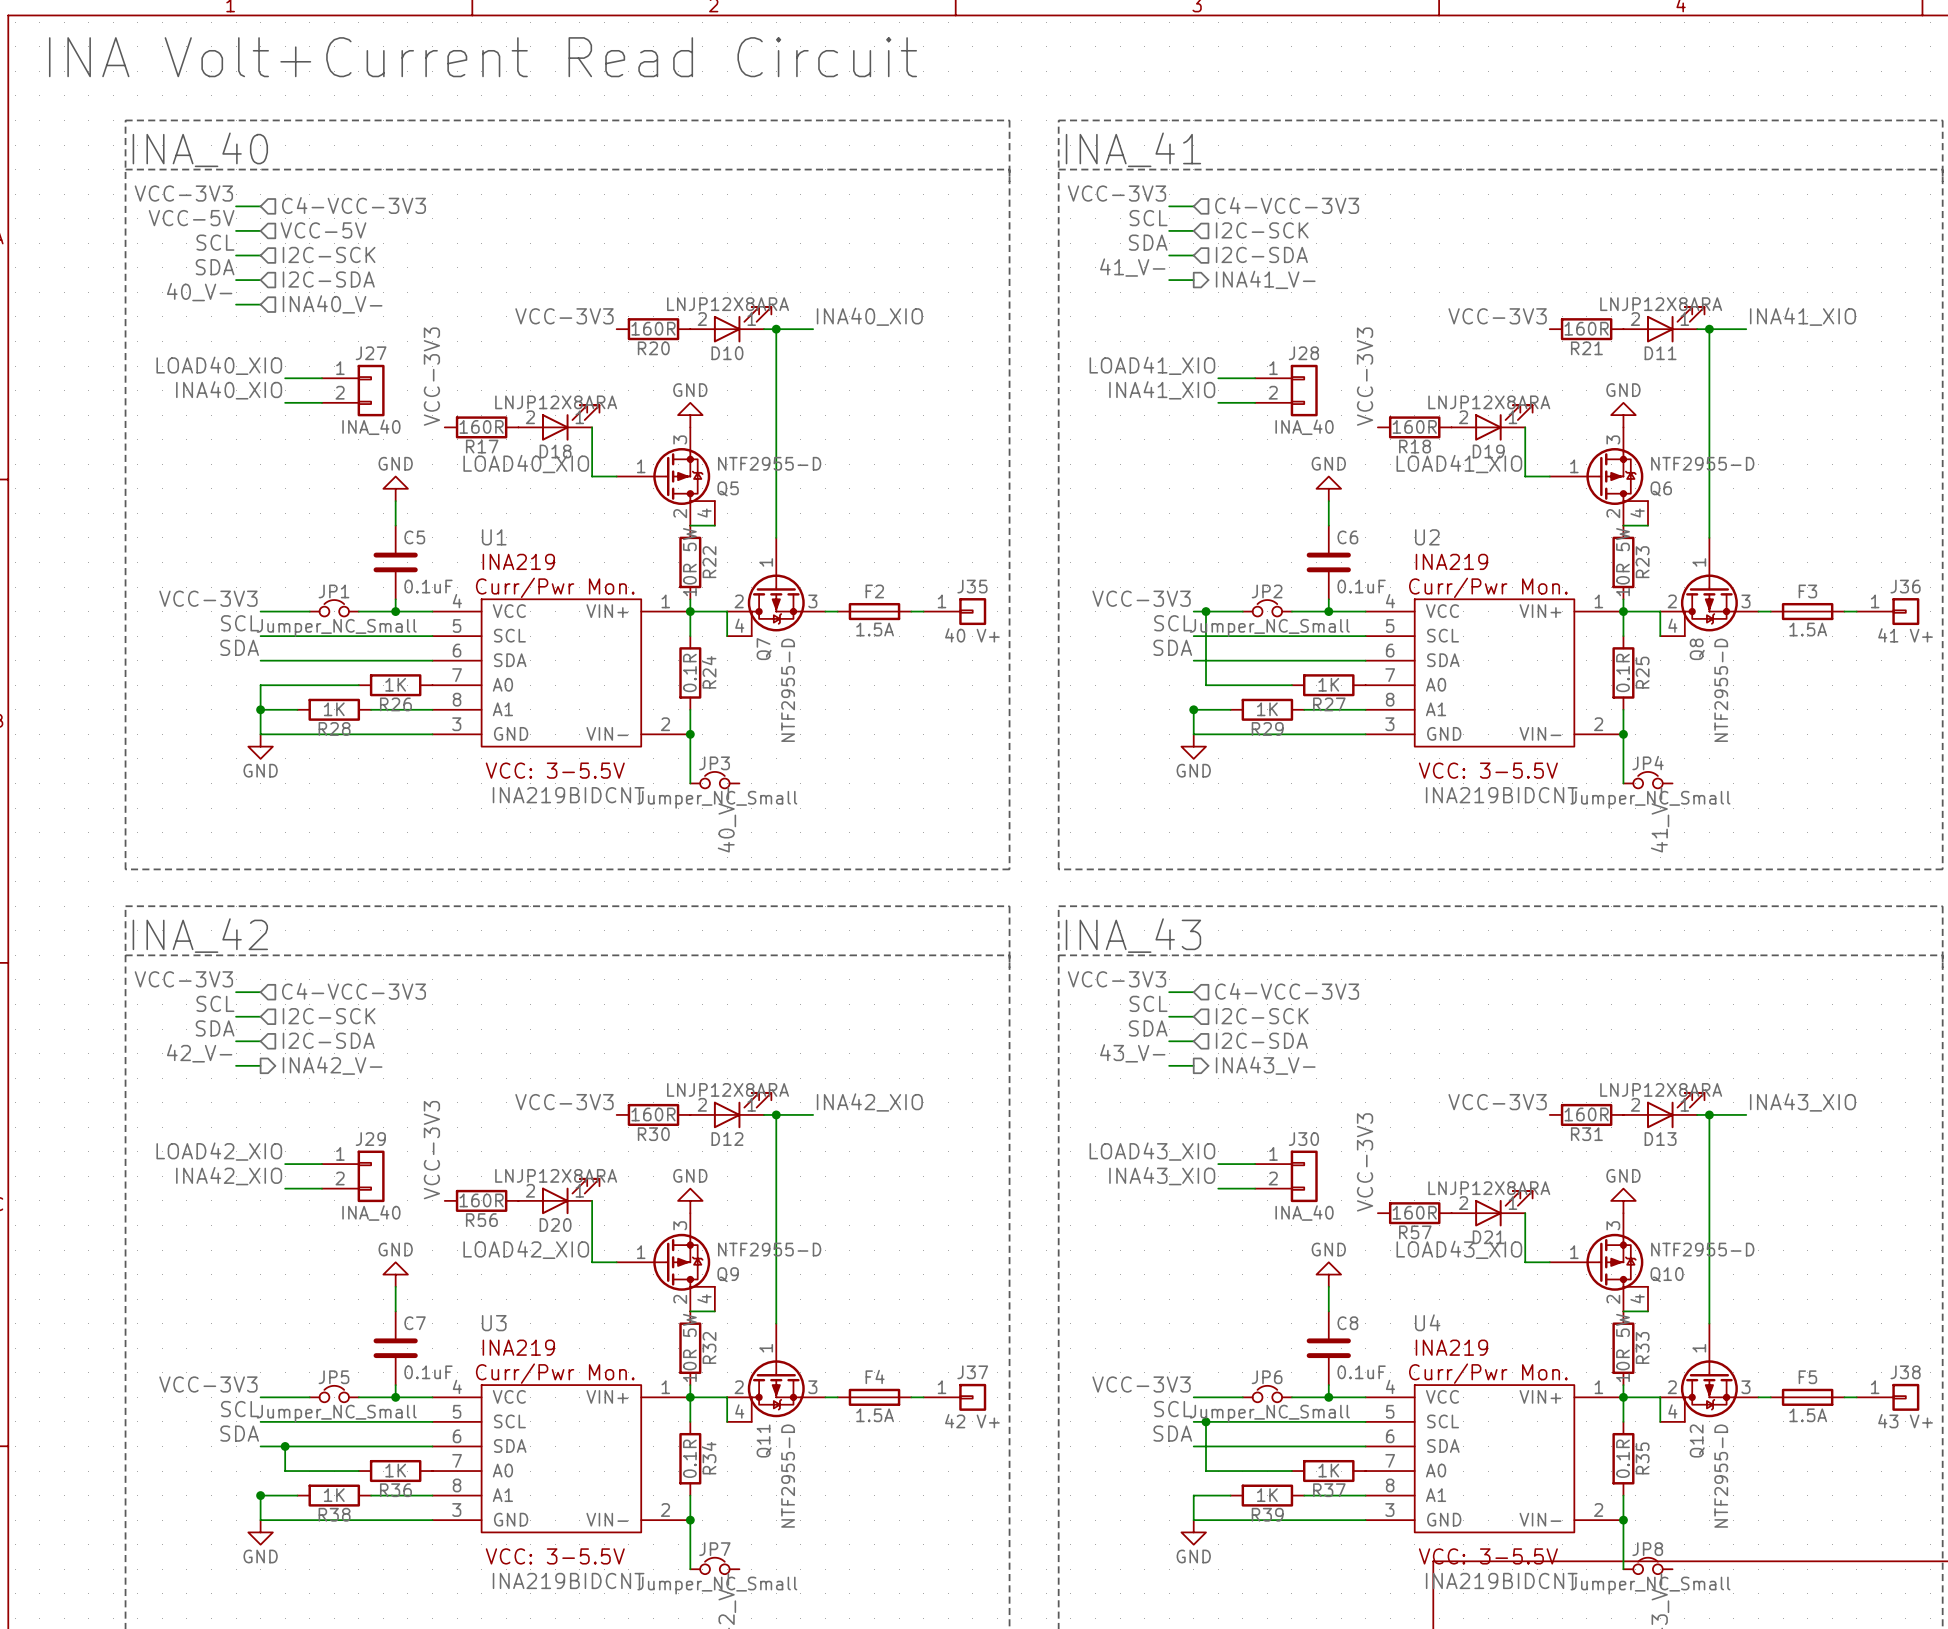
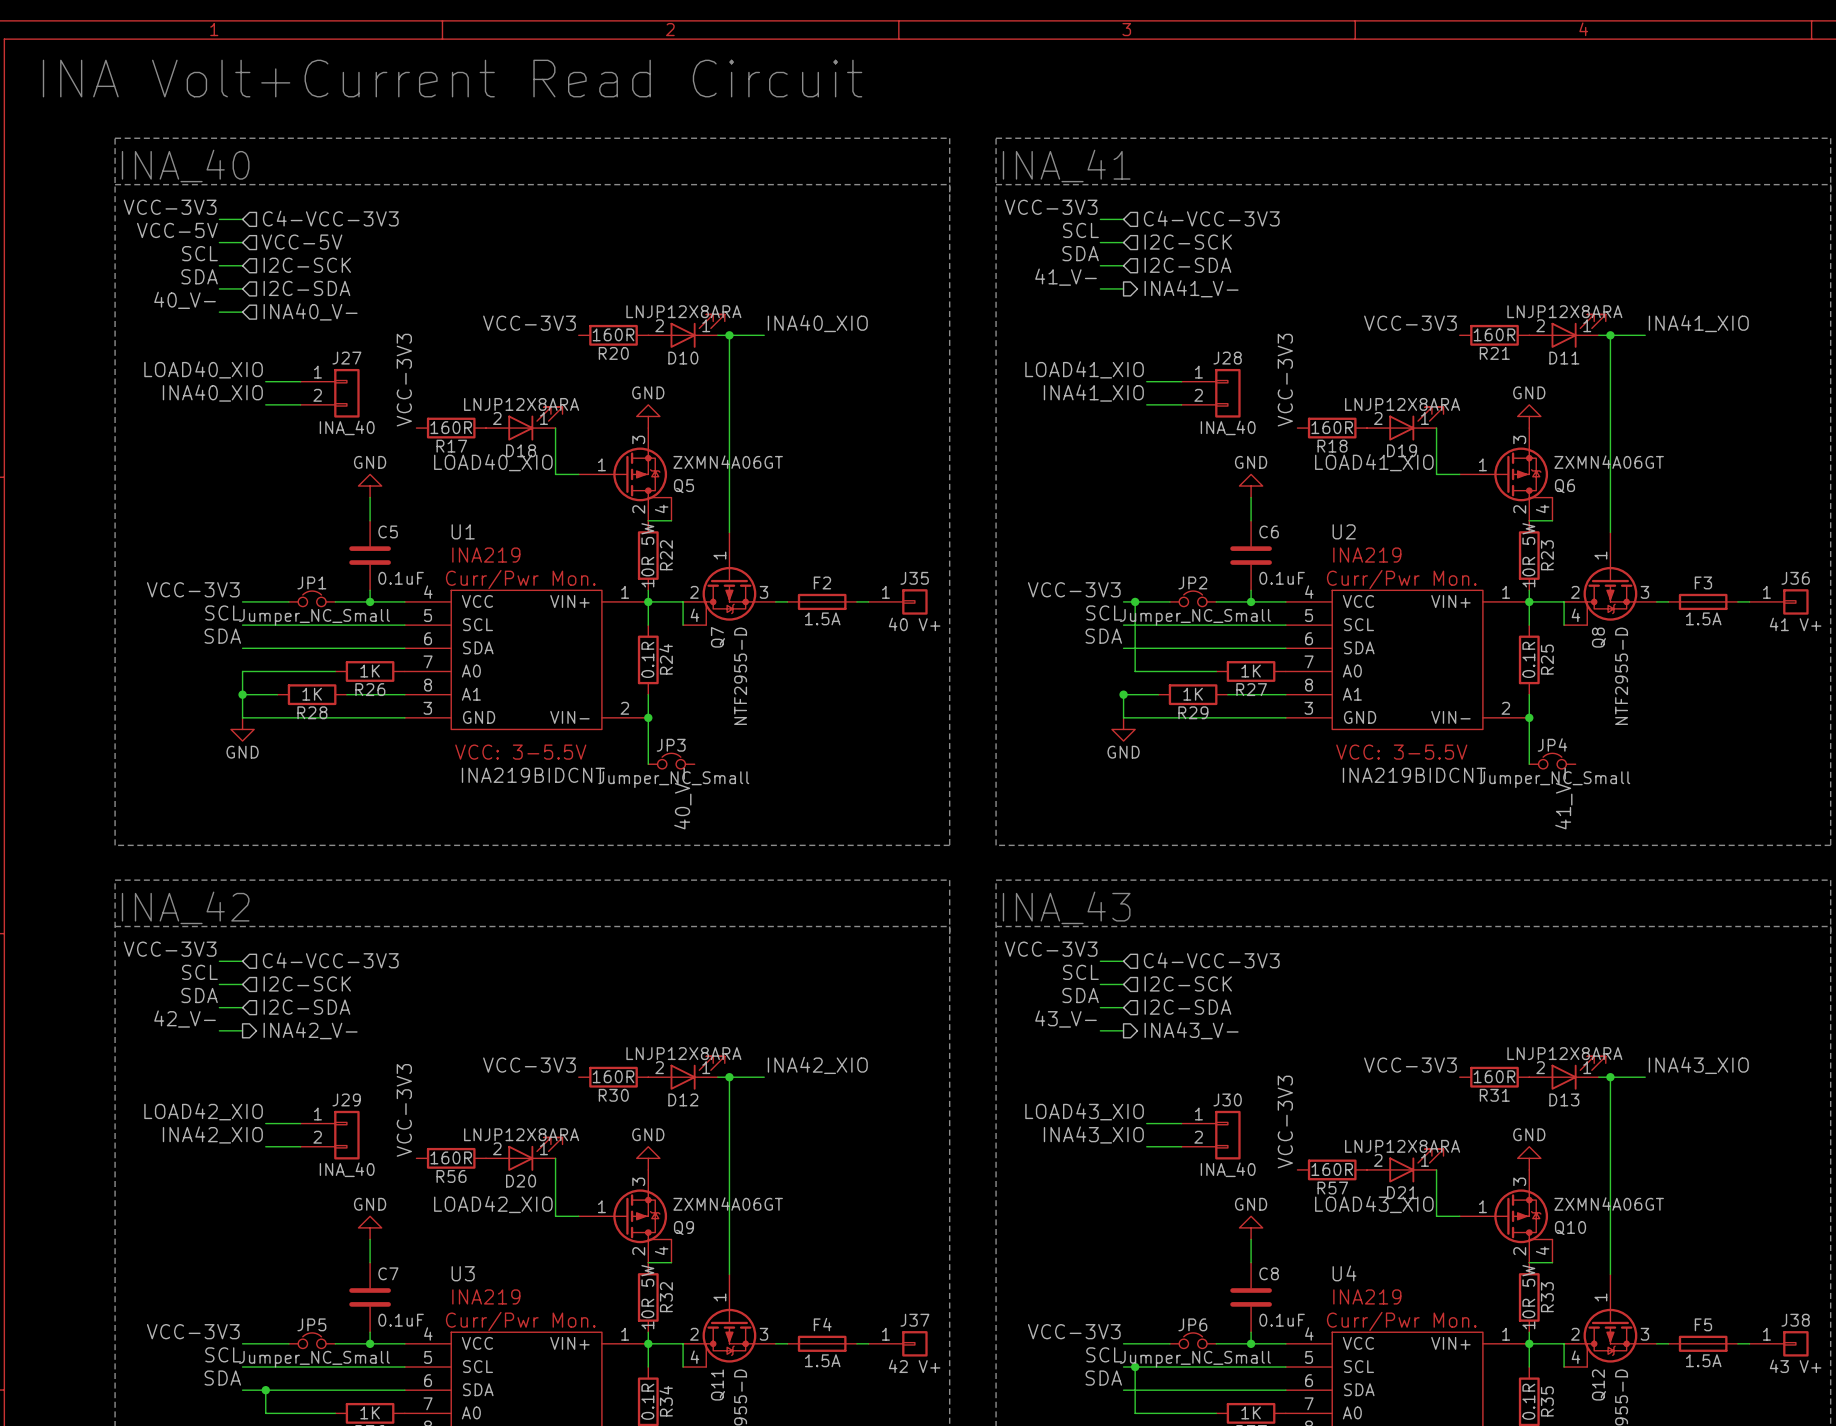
Q5 value: NTF2955-D (769, 463) -> ZXMN4A06GT (728, 462)
Q6 value: NTF2955-D (1702, 463) -> ZXMN4A06GT (1609, 462)
Q9 value: NTF2955-D (769, 1249) -> ZXMN4A06GT (728, 1204)
Q10 value: NTF2955-D (1702, 1249) -> ZXMN4A06GT (1609, 1204)

